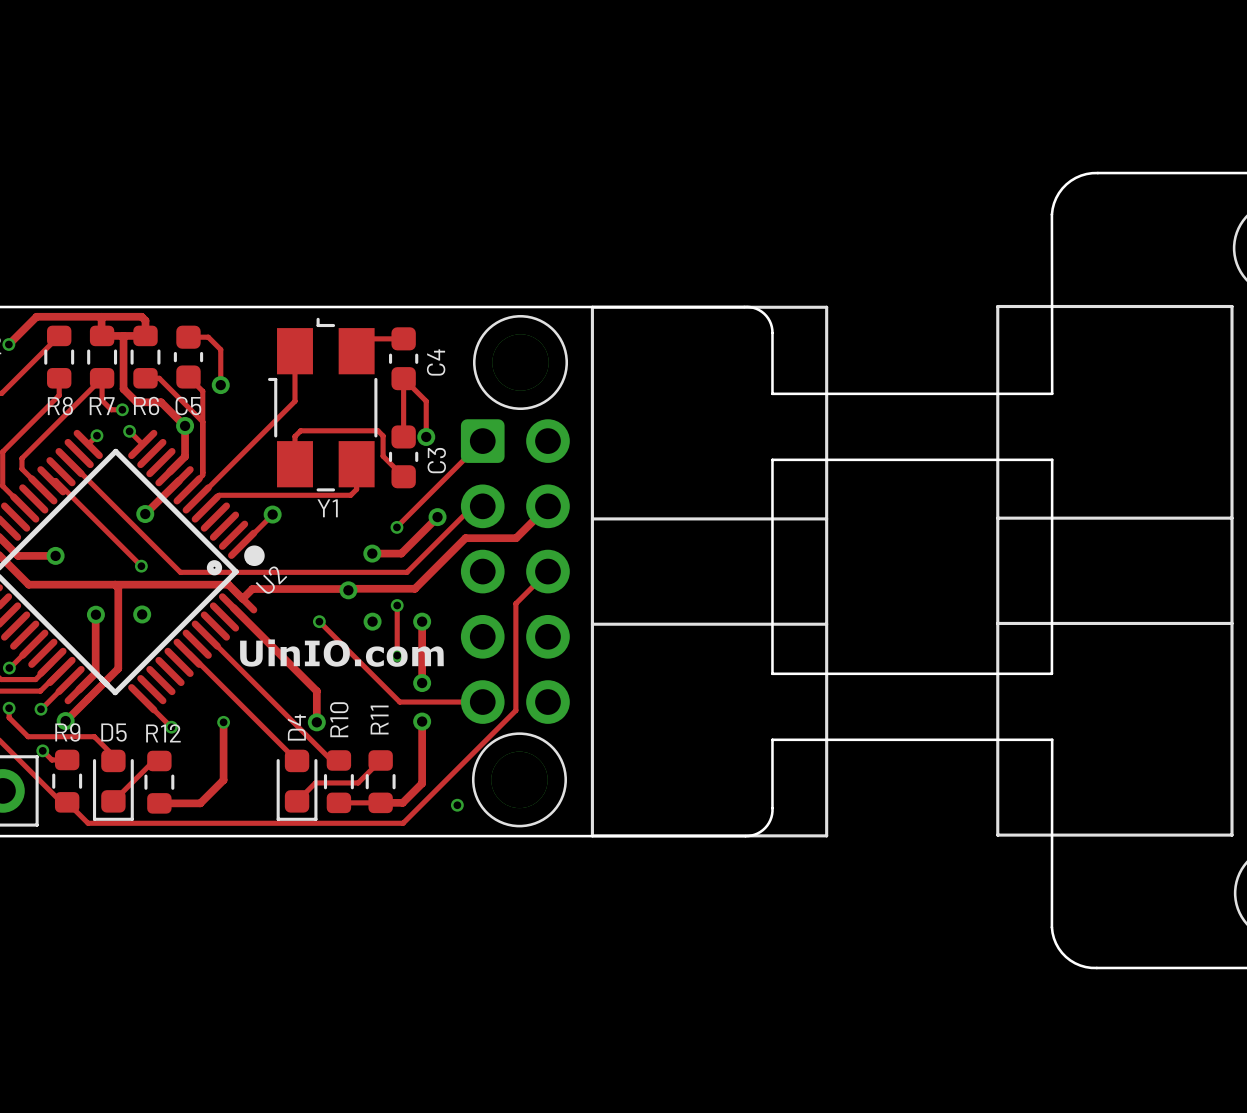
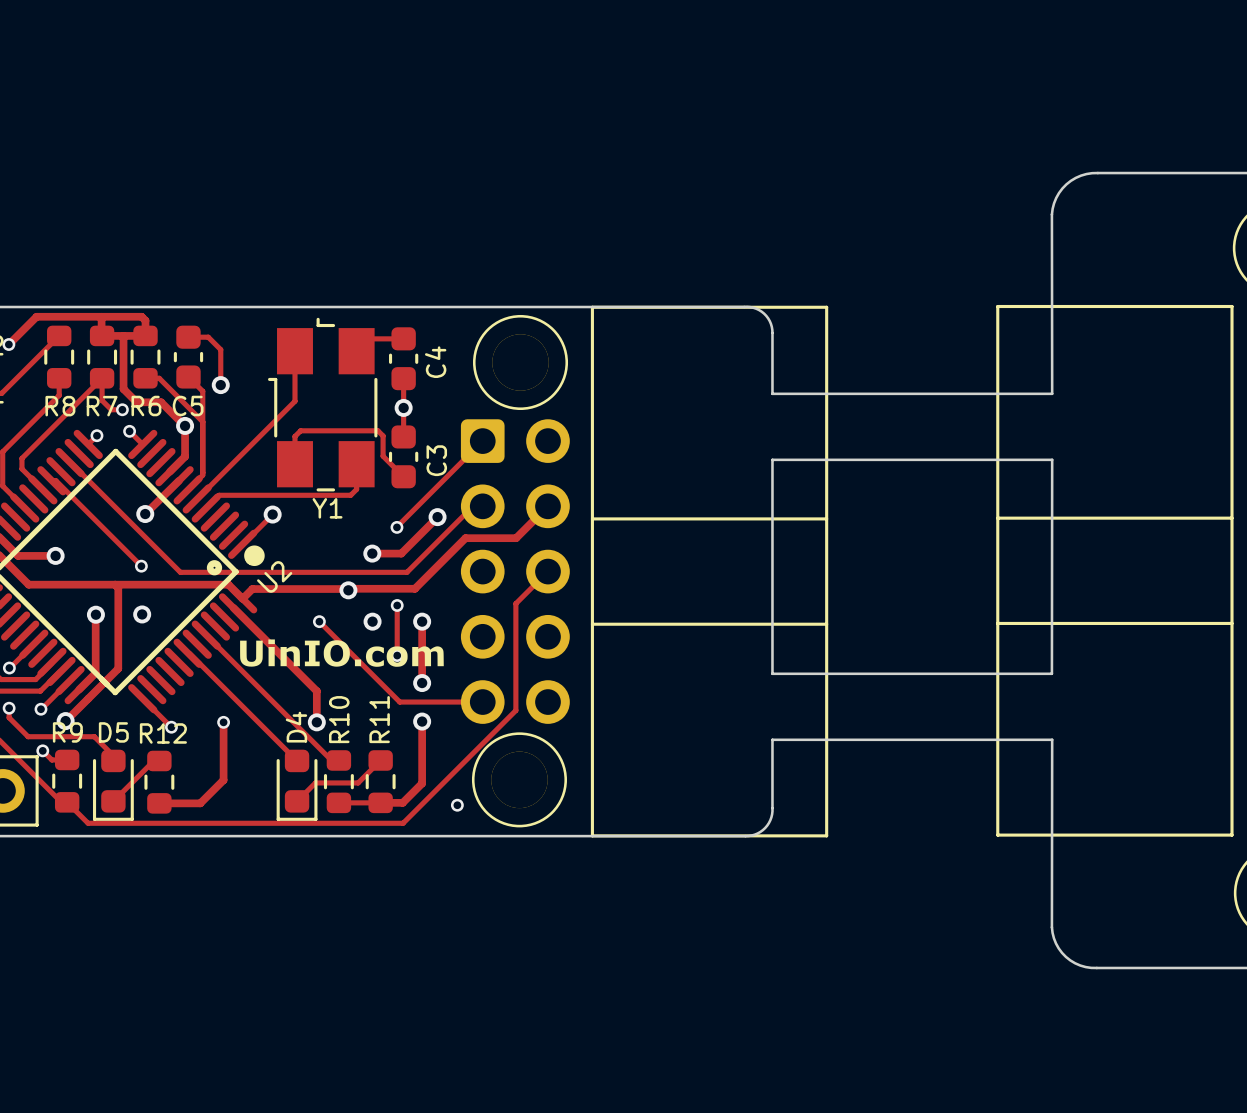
track: (403, 378) (426, 401) (426, 436) -> none
via position: (426, 436) -> (403, 407)

